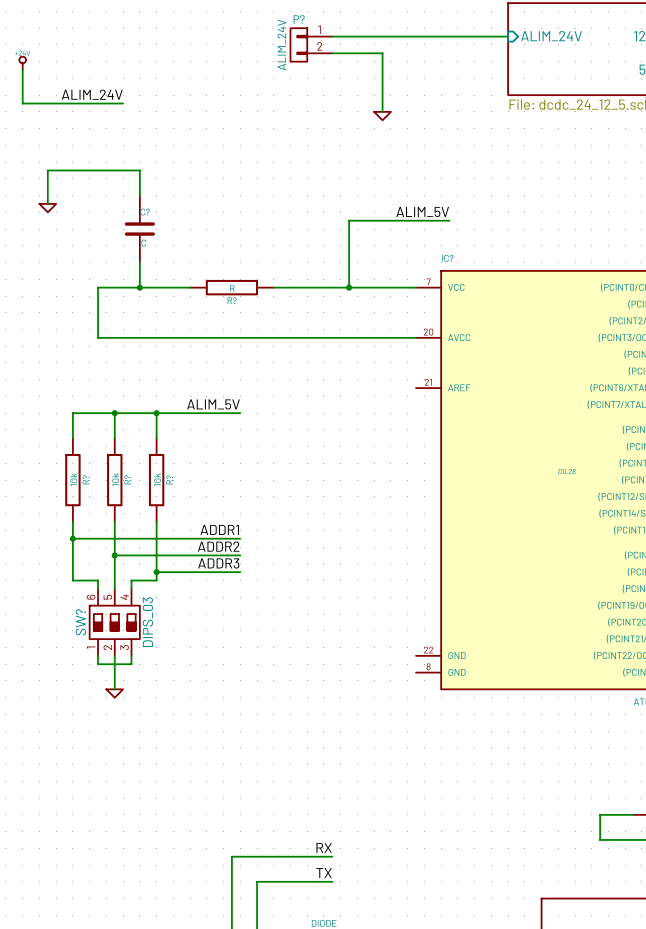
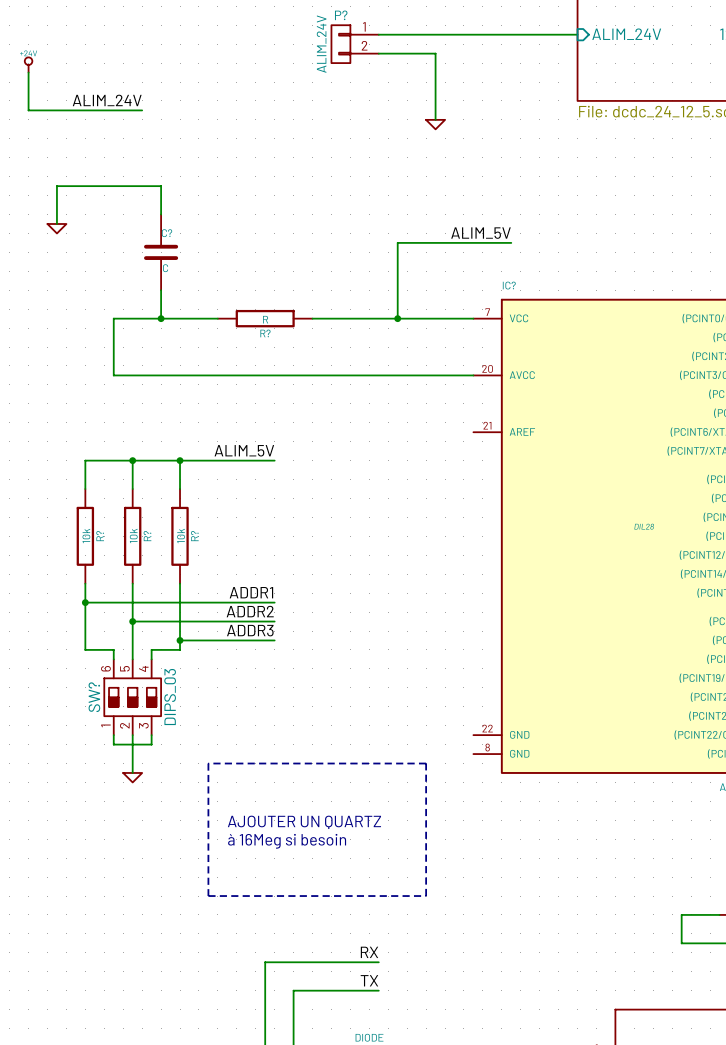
line: none -> (208, 763) (208, 896) (426, 896) (426, 763) (208, 763)
text: none -> AJOUTER UN QUARTZ (304, 822)
text: none -> à 16Meg si besoin (287, 841)

